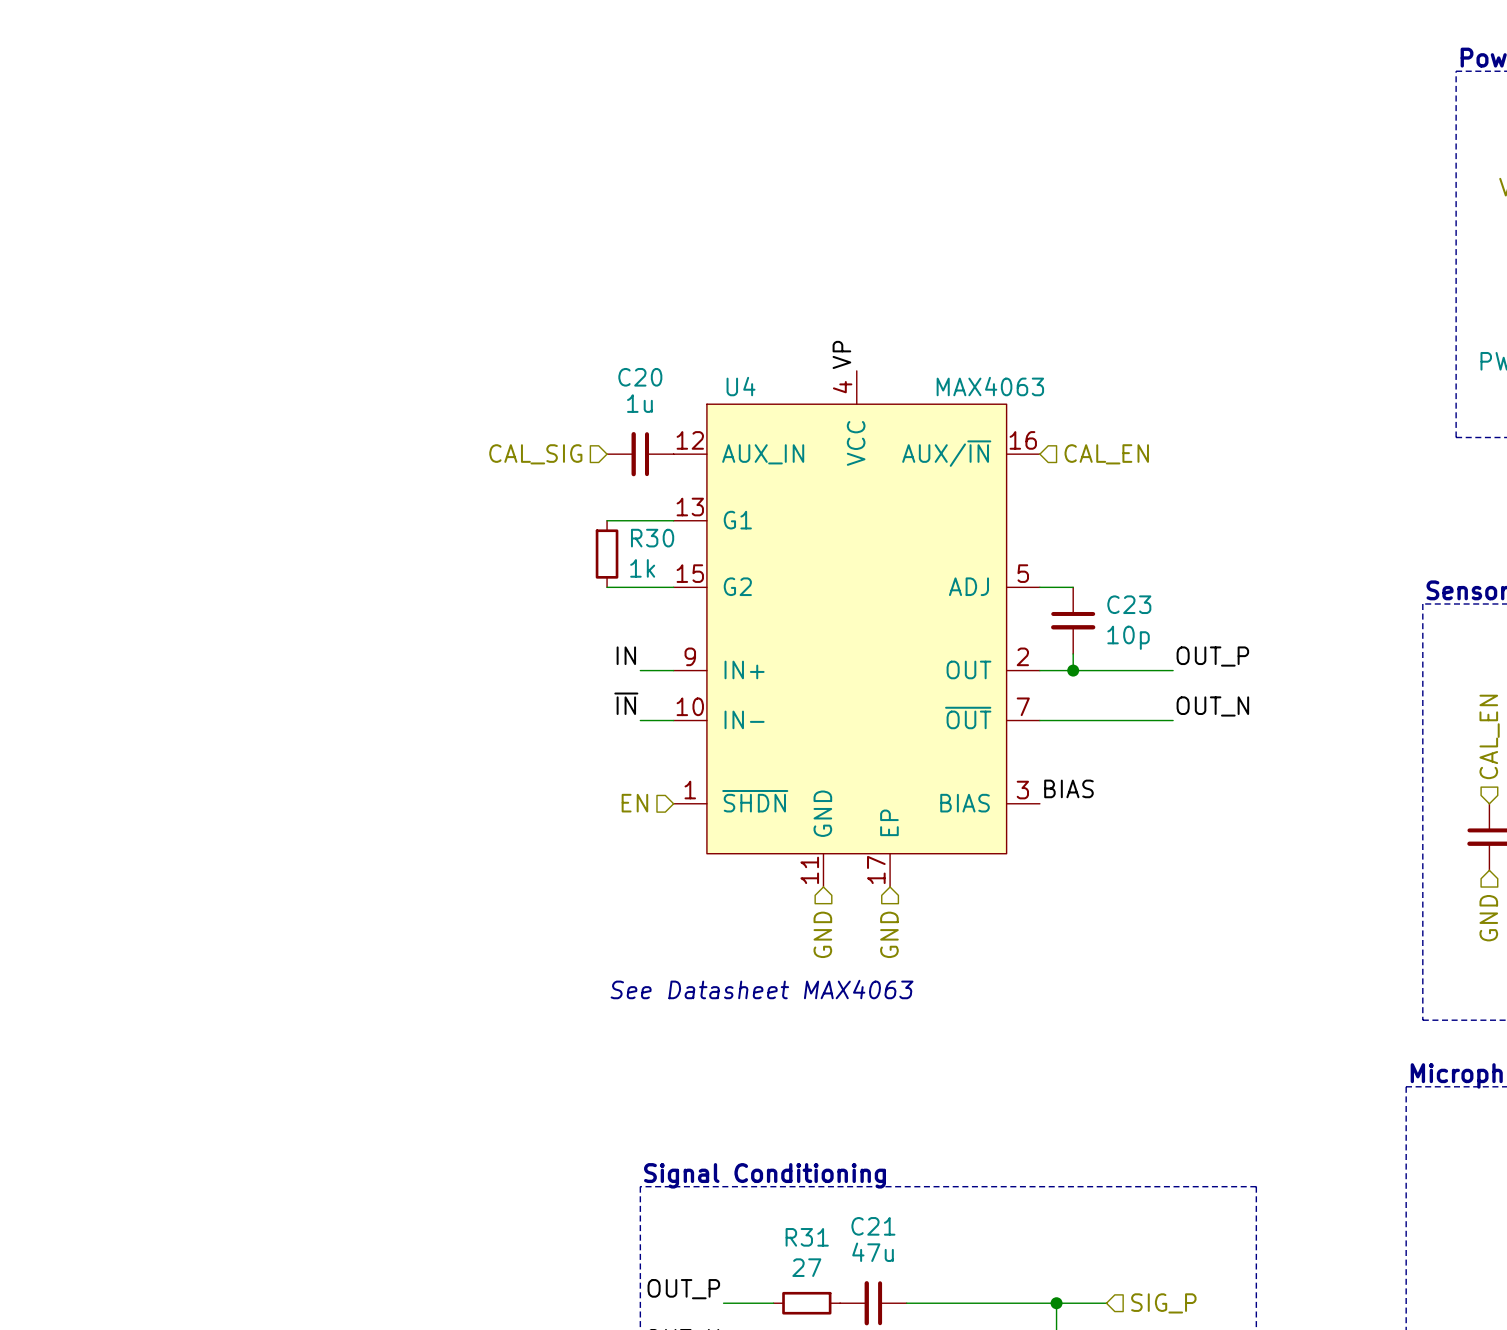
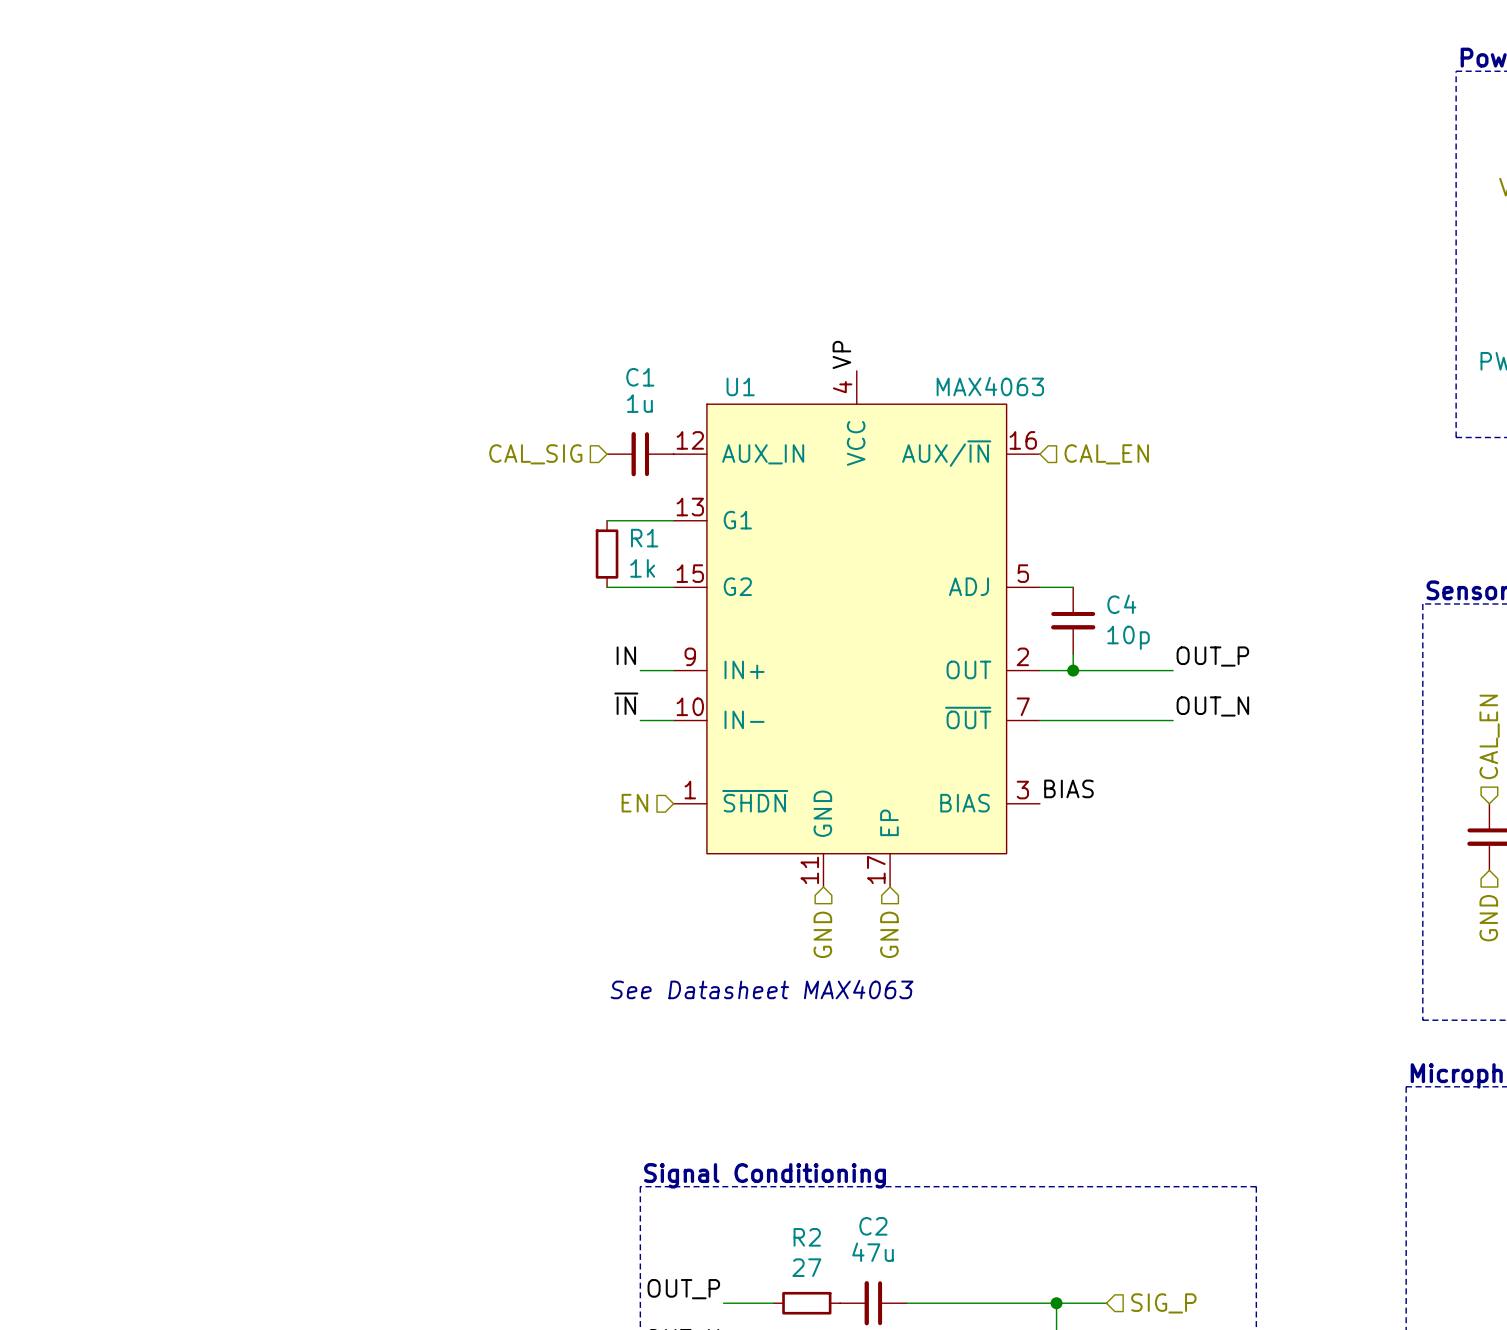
C20 name: C20 (640, 377) -> C1 (640, 377)
U4 name: U4 (741, 386) -> U1 (740, 386)
R30 name: R30 (652, 538) -> R1 (644, 538)
C23 name: C23 (1129, 604) -> C4 (1121, 604)
C21 name: C21 (873, 1226) -> C2 (873, 1226)
R31 name: R31 (807, 1237) -> R2 (807, 1237)

